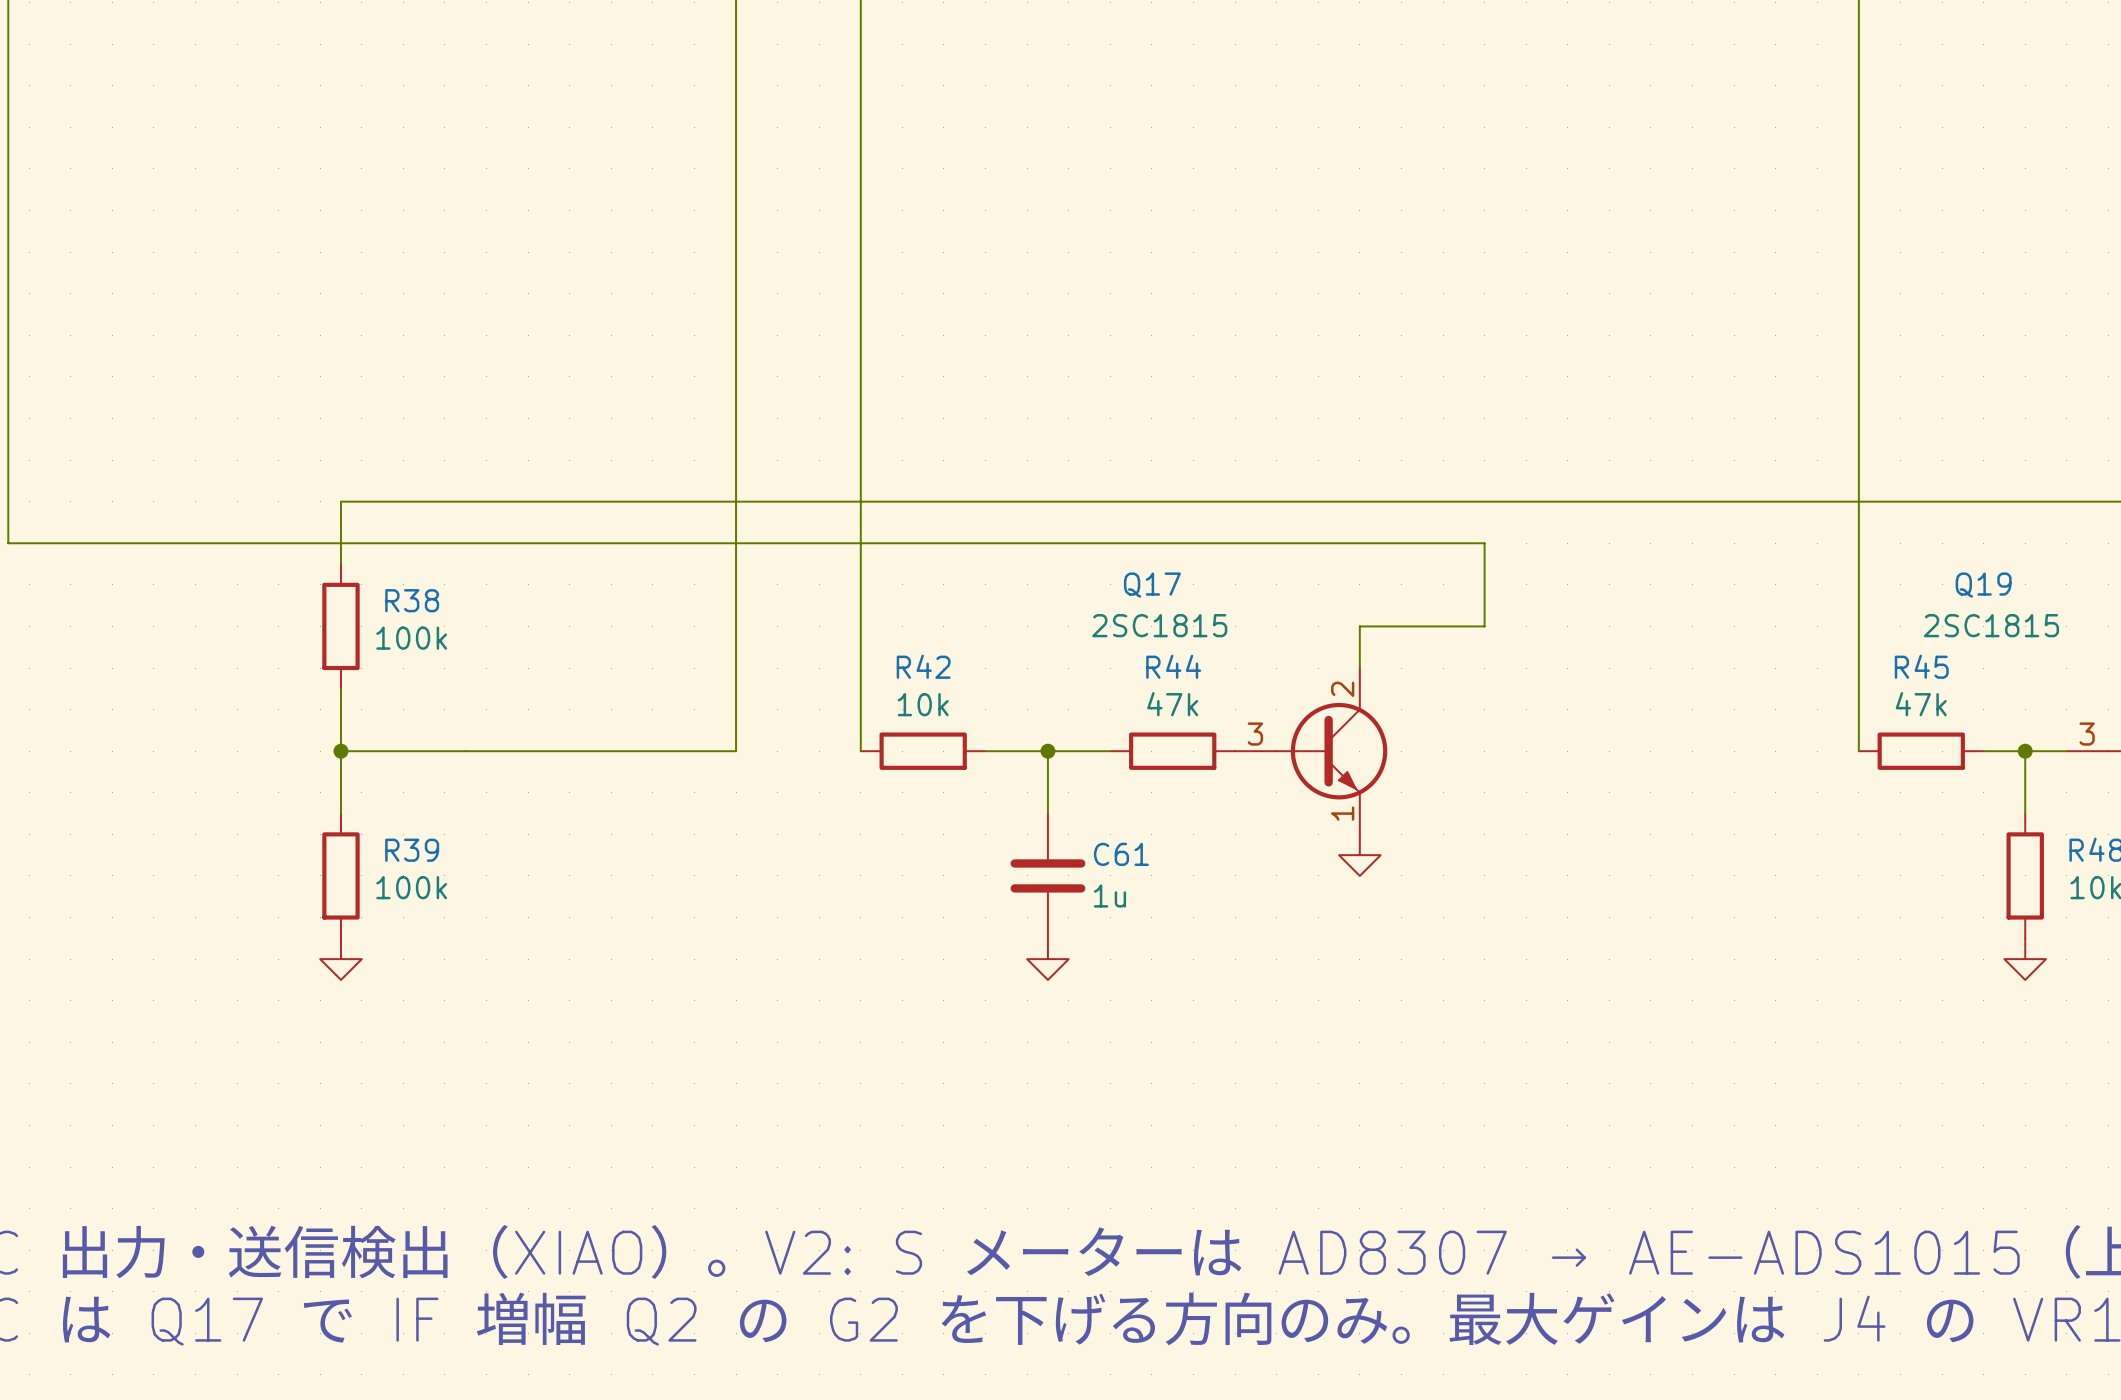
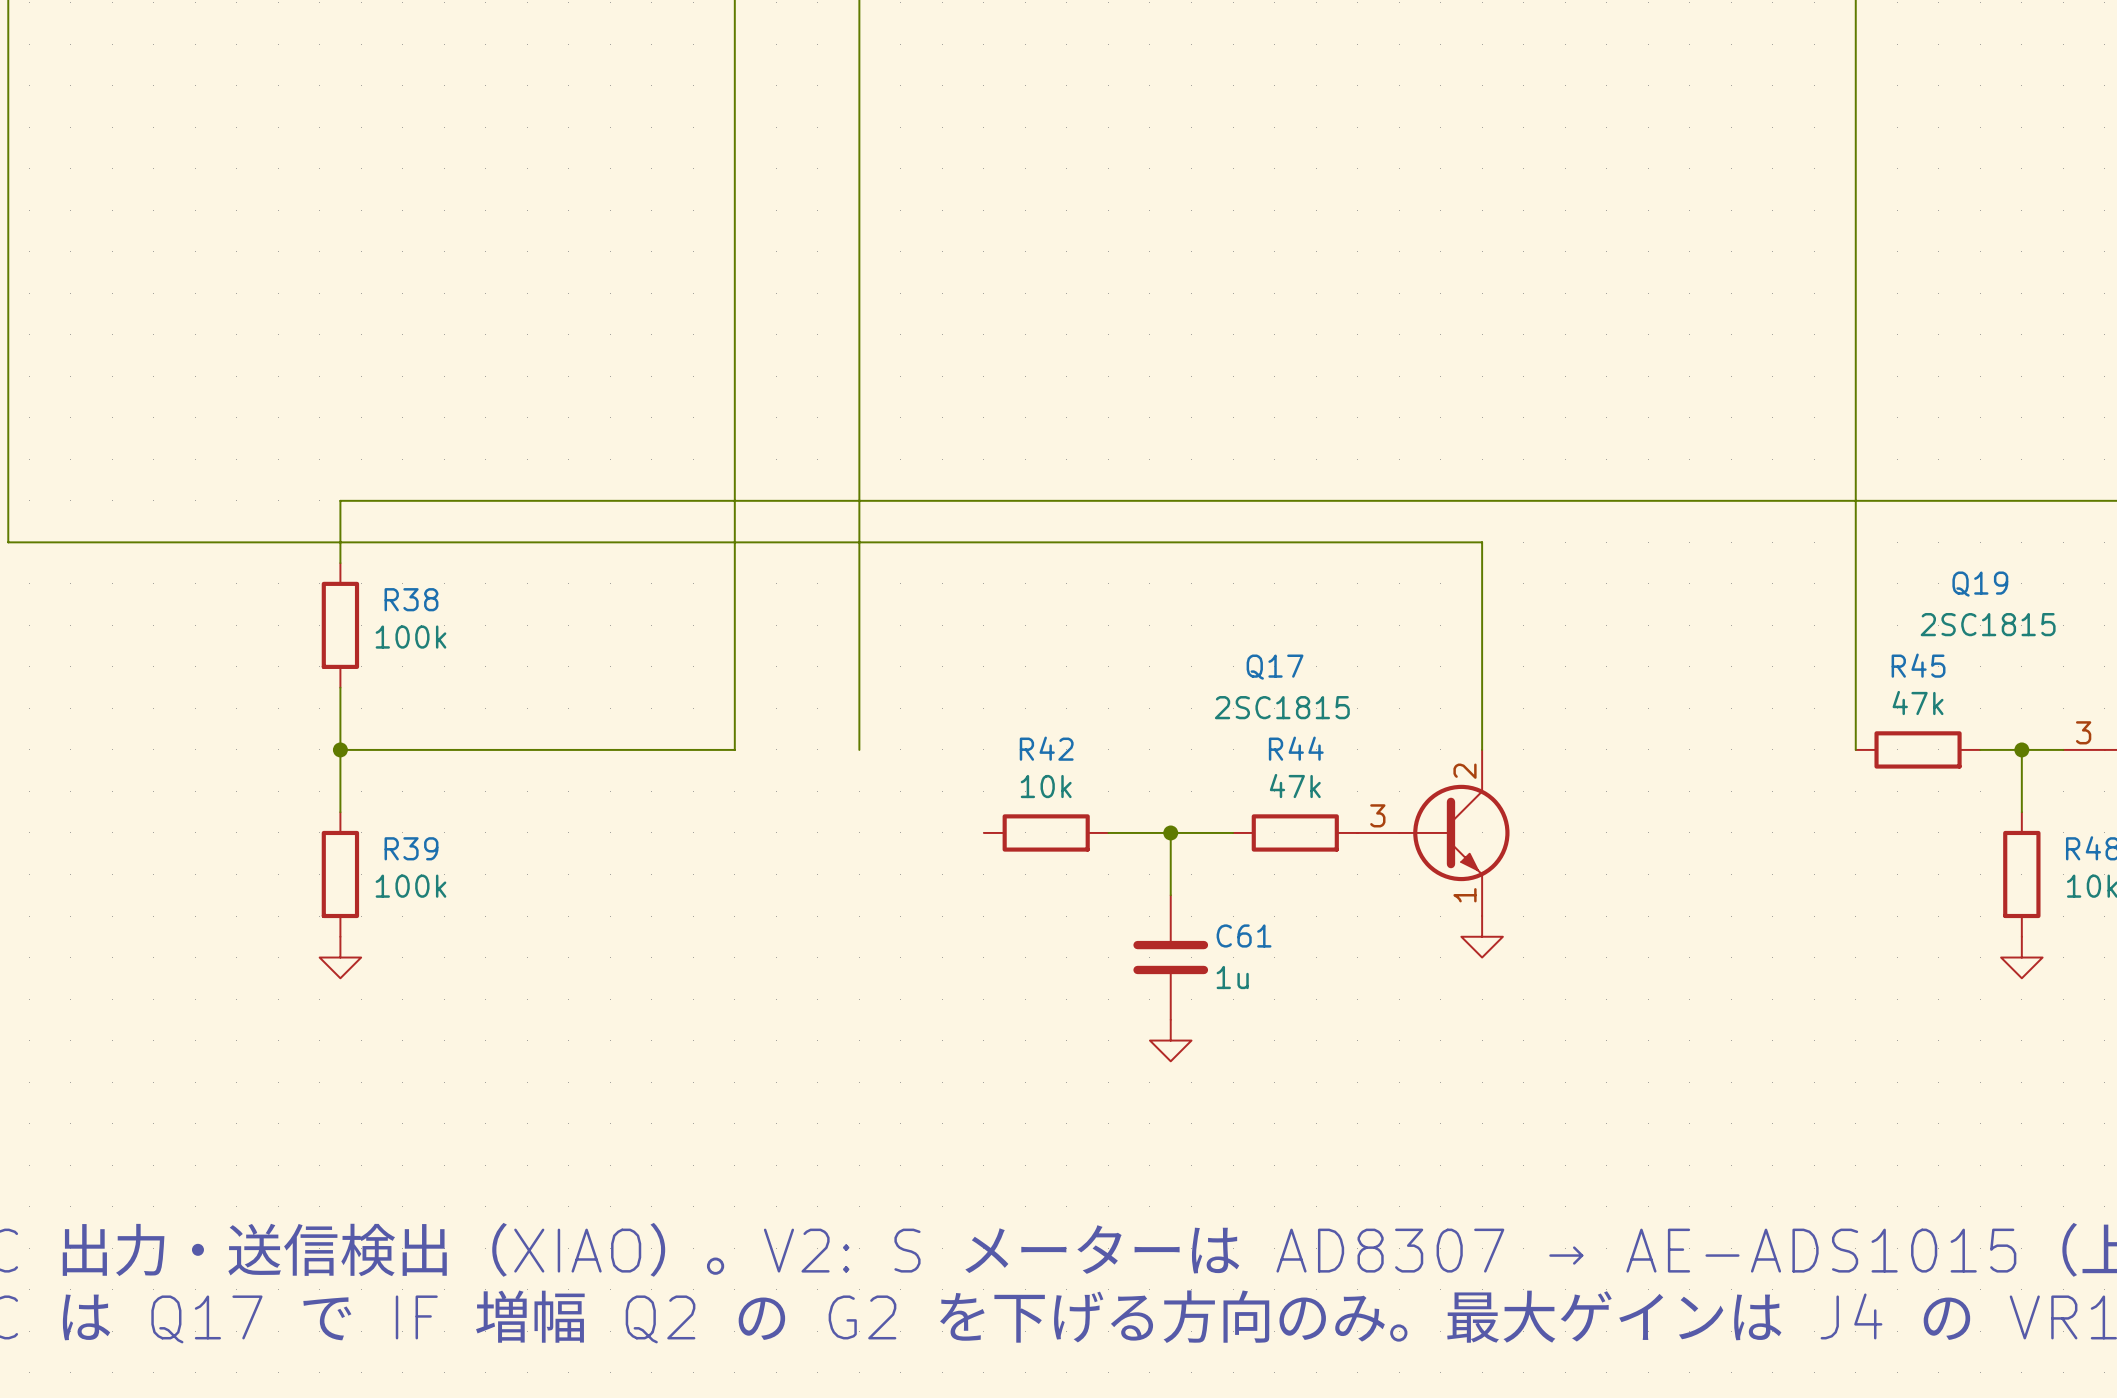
wire: (1484, 626) (1359, 626) (1359, 668) -> (1482, 625) (1482, 749)
R42 position: (923, 751) -> (1046, 832)
wire: (985, 751) (1110, 751) -> (1108, 832) (1233, 832)
wire: (1047, 751) (1047, 813) -> (1170, 832) (1170, 895)
junction: (1047, 751) -> none
R44 position: (1172, 751) -> (1295, 832)
Q17 position: (1311, 751) -> (1433, 832)
junction: none -> (1170, 832)
power symbol: (1359, 855) -> none
C61 position: (1047, 875) -> (1170, 957)
power symbol: none -> (1482, 936)
power symbol: (1047, 959) -> none
power symbol: none -> (1170, 1040)

